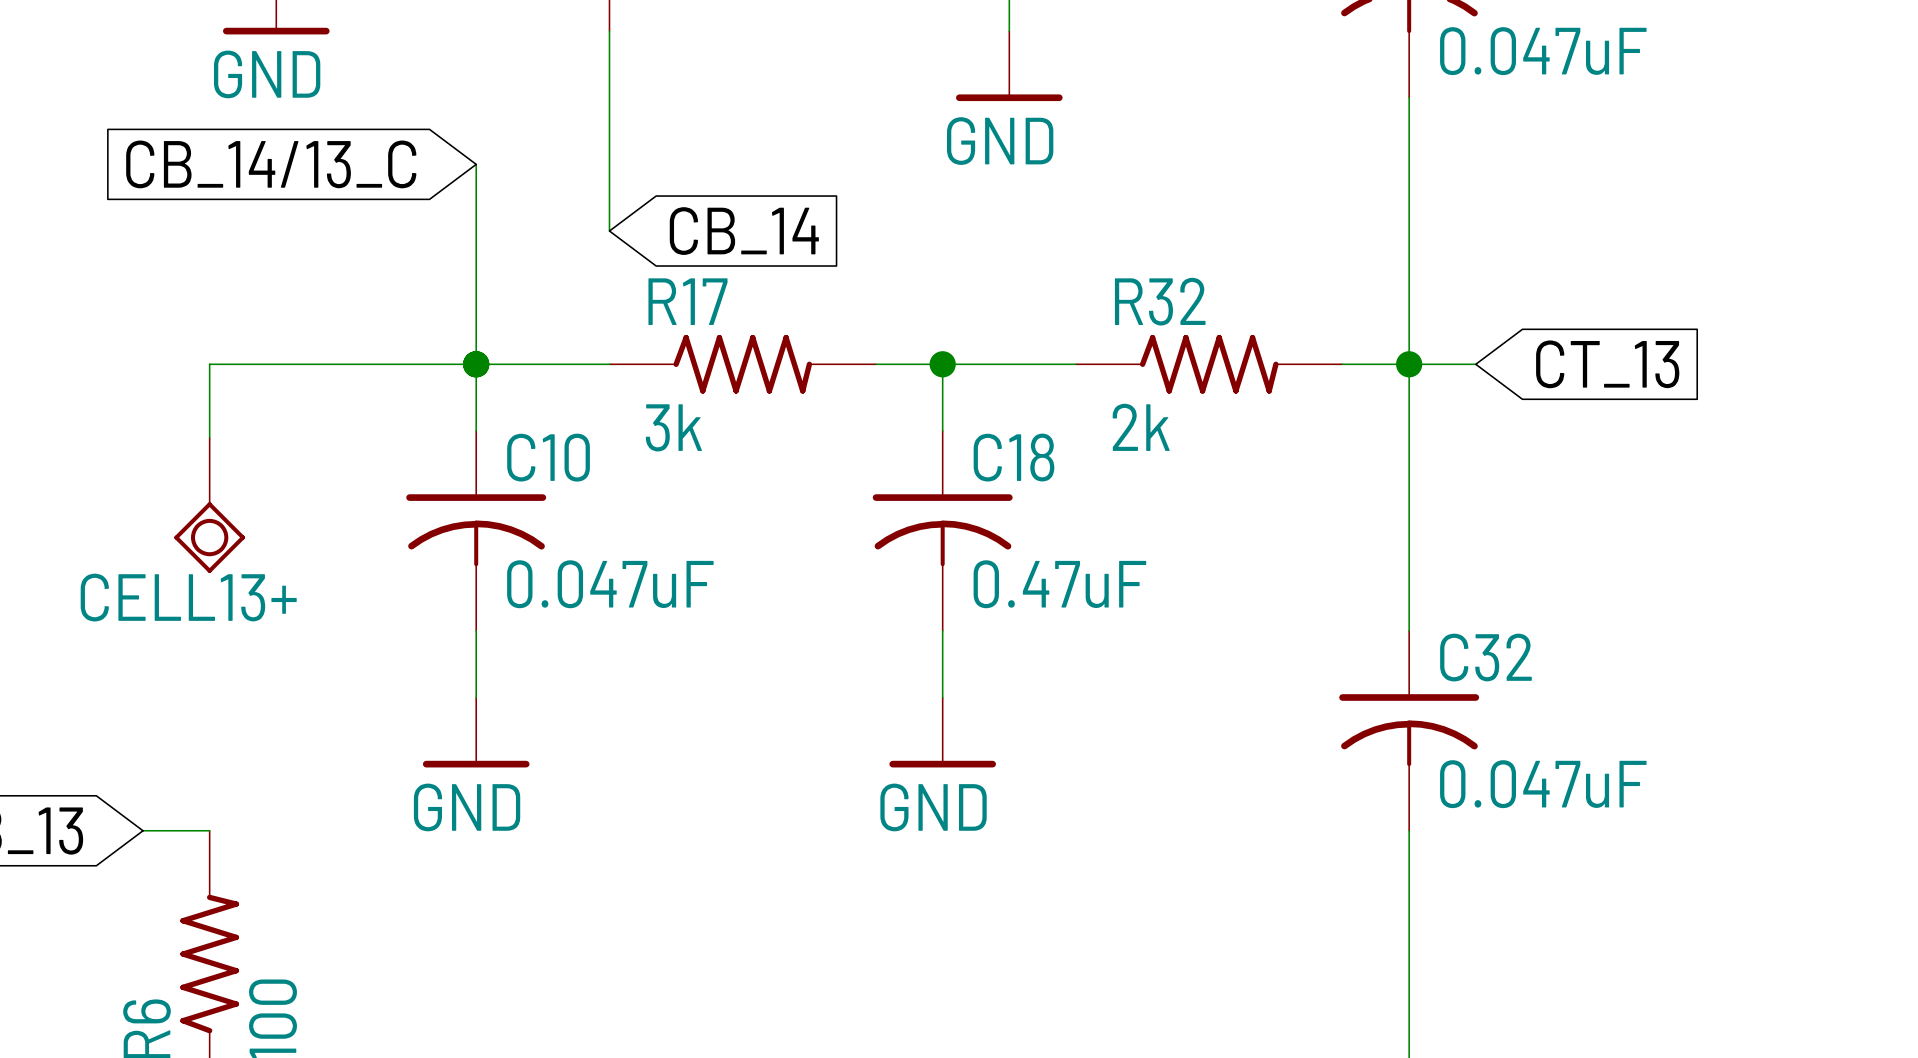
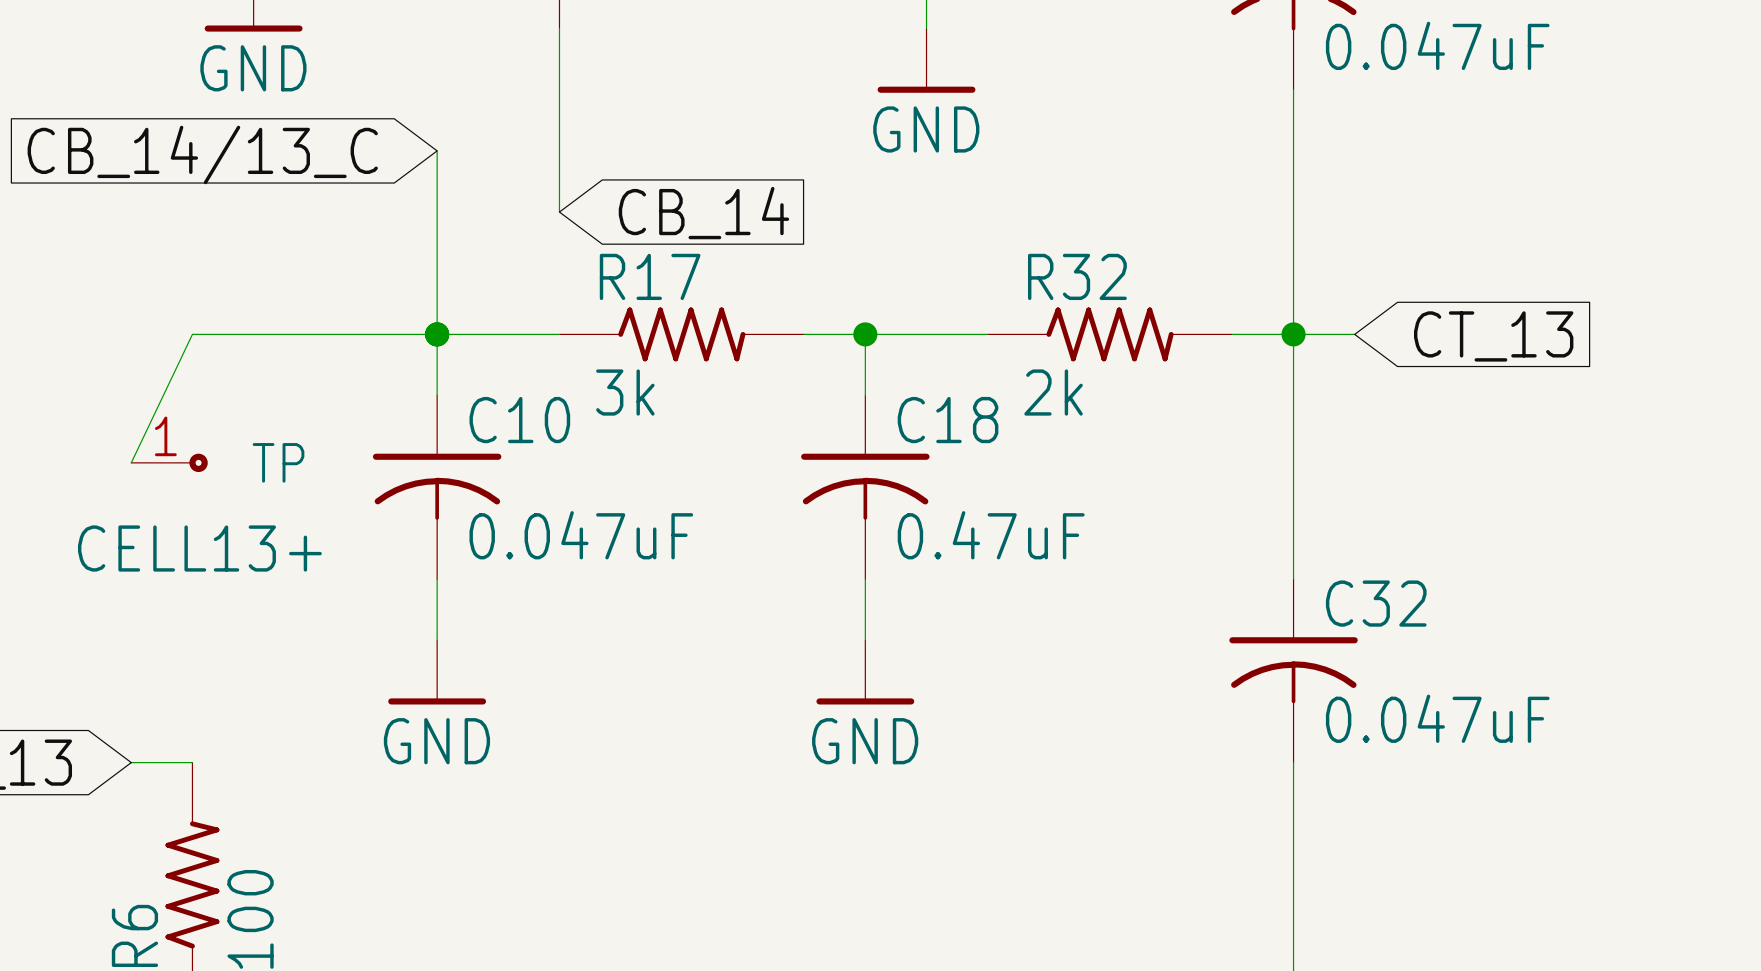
wire: (209, 364) (209, 437) -> (192, 334) (131, 462)
CELL13+ symbol: [174, 437, 245, 573] -> [131, 453, 208, 473]

